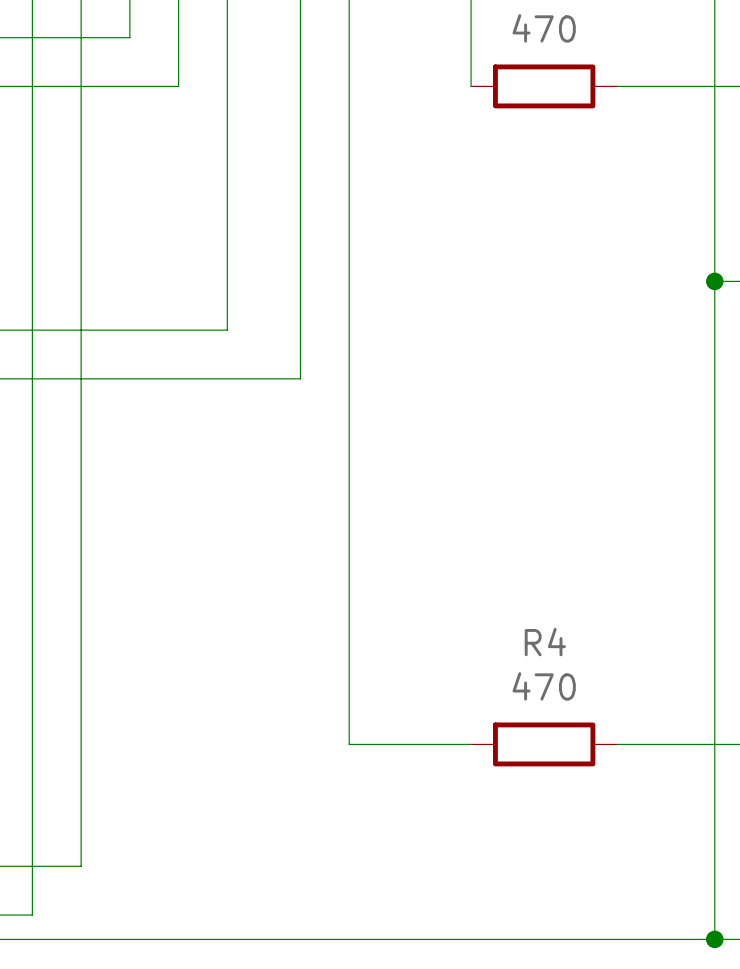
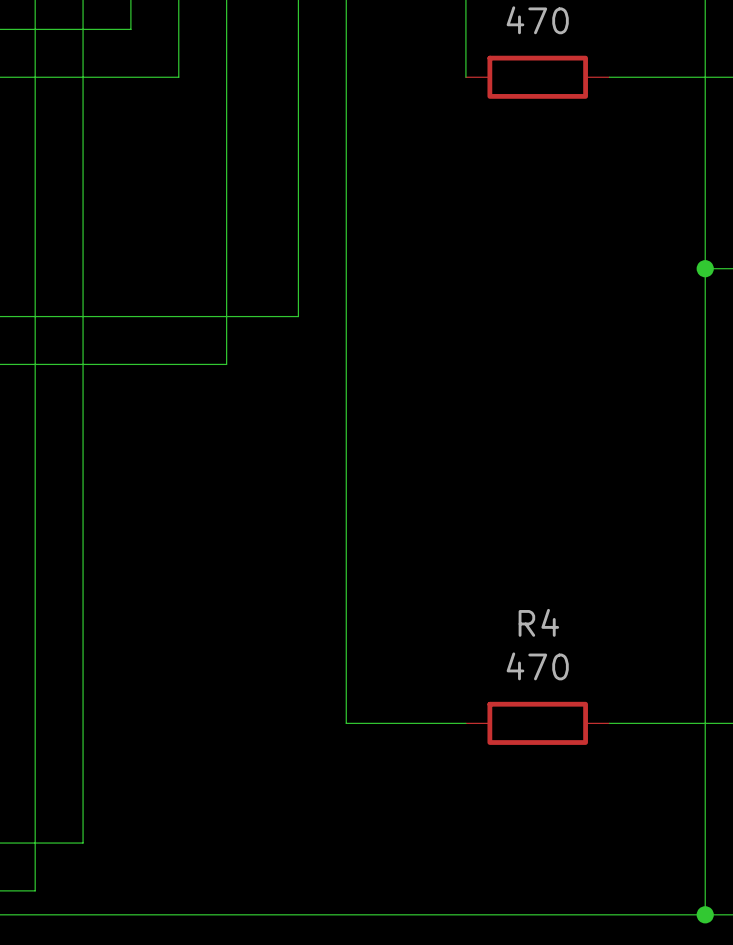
wire: (300, 330) (300, 378) (227, 378) -> (298, 316) (226, 316) (226, 364)

